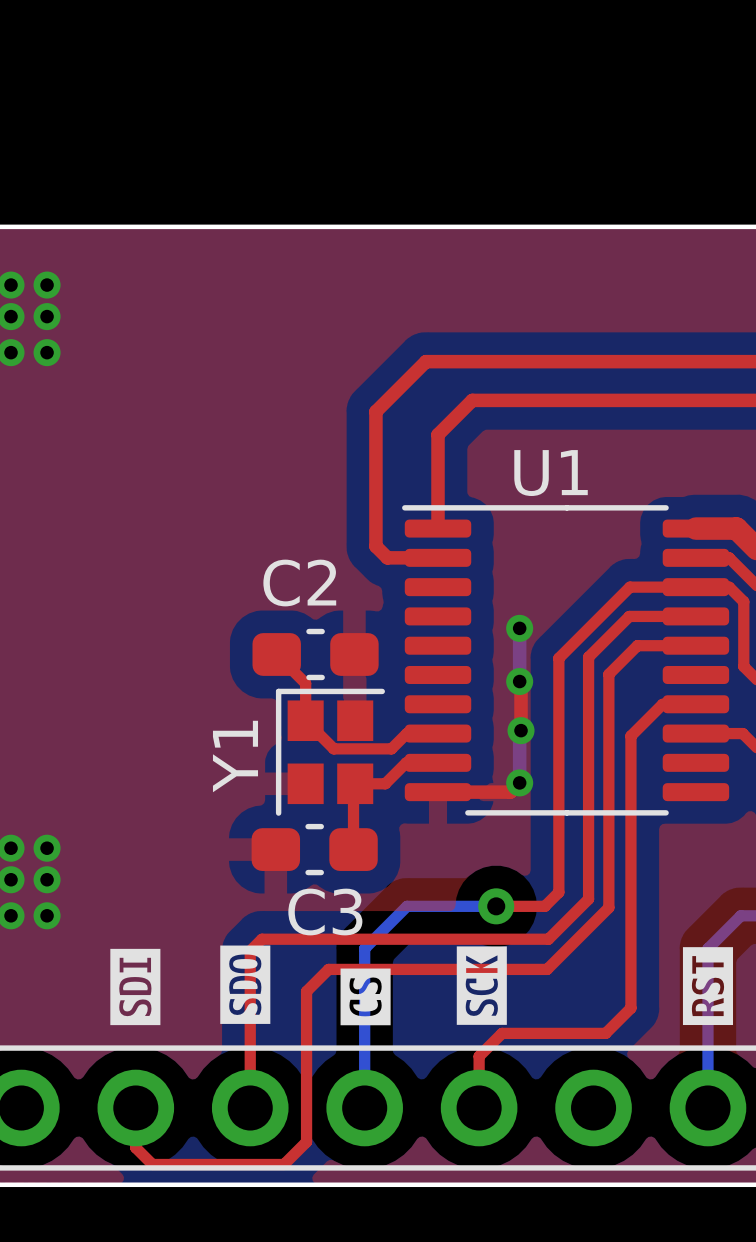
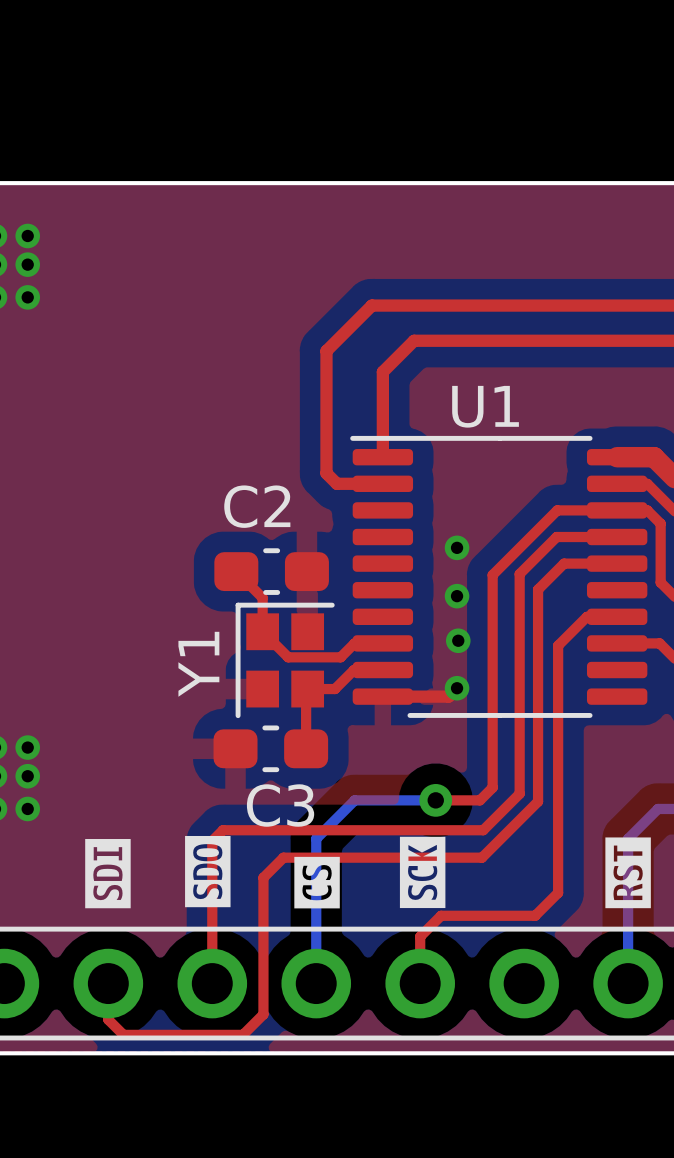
bottom track: (519, 628) (519, 681) -> none
top track: (521, 682) (521, 730) -> none
bottom track: (519, 731) (519, 782) -> none

